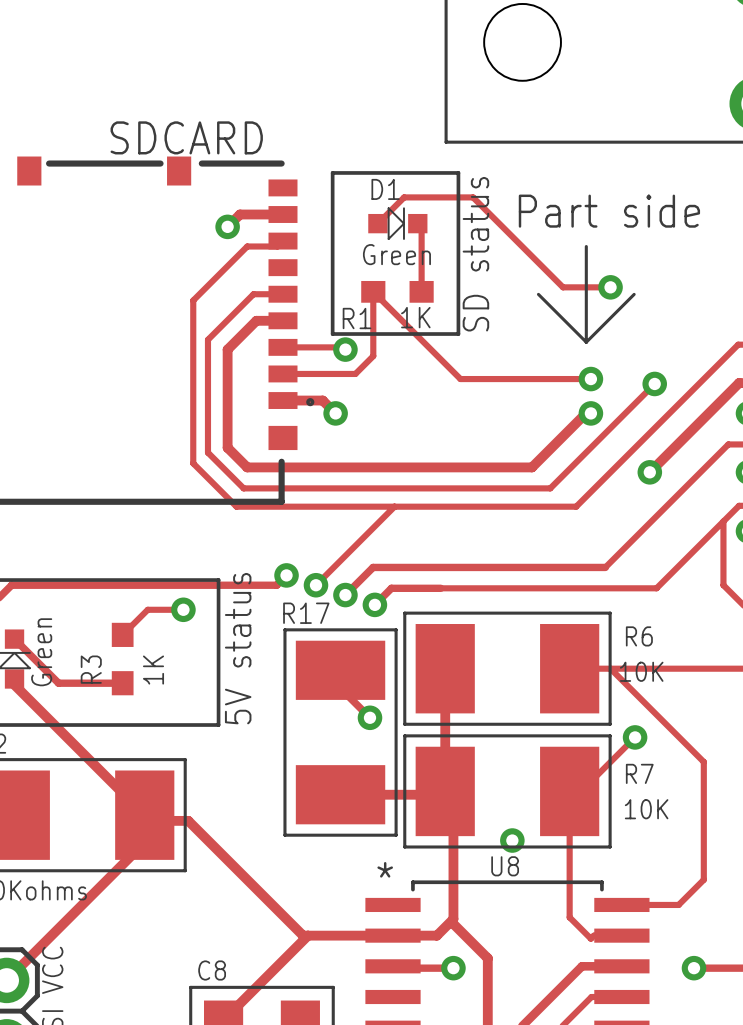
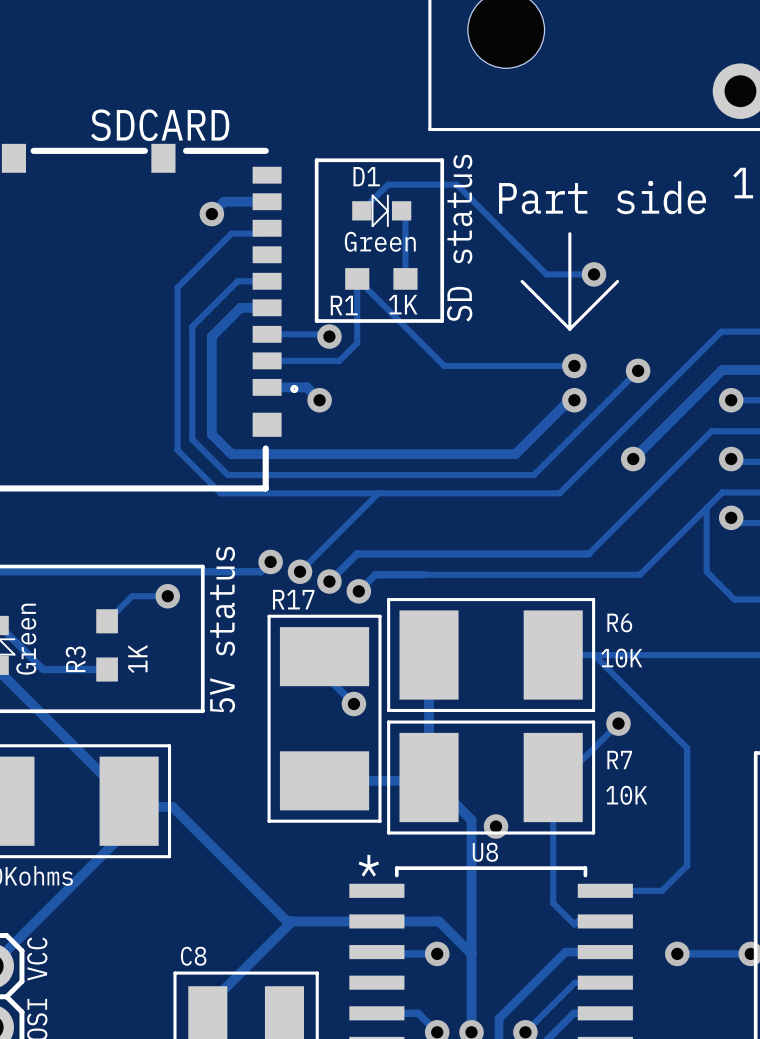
track: (453, 799) (453, 919) (436, 935) -> (471, 953) (439, 921) (420, 921)
track: (453, 923) (487, 958) -> (429, 777) (471, 820) (471, 944)

